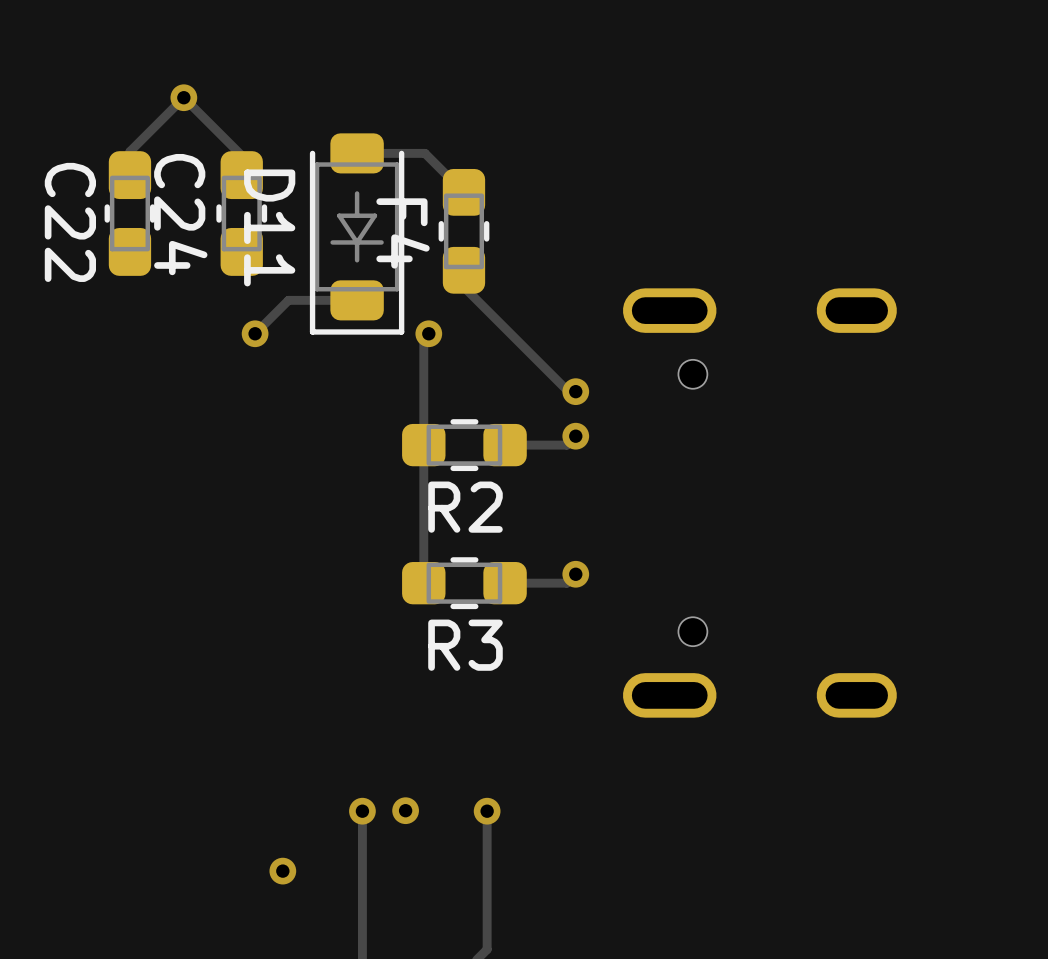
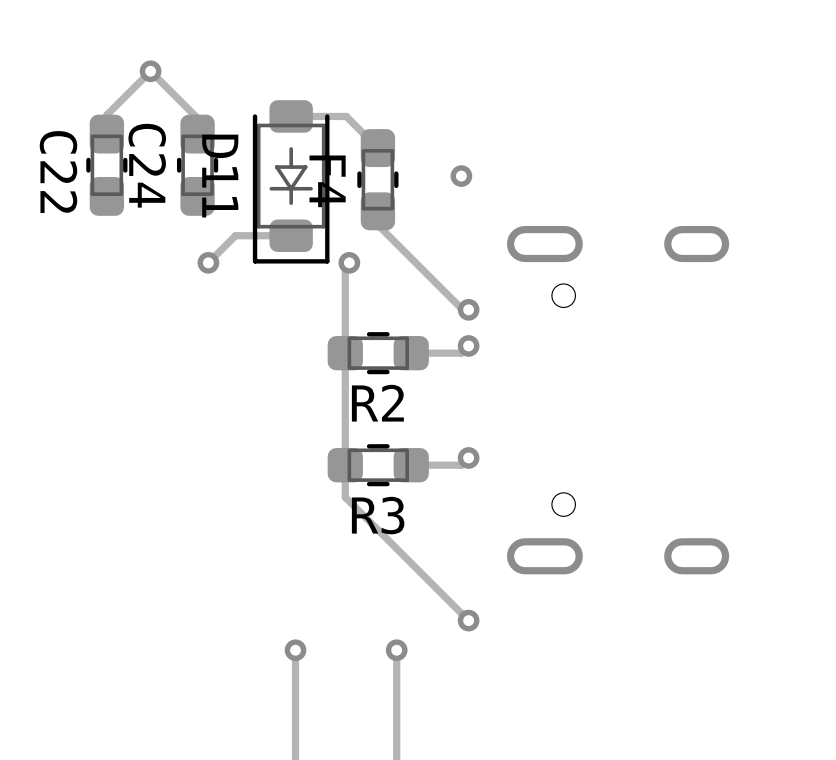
via: none -> (461, 176)
track: none -> (345, 465) (345, 497) (468, 620)
via: none -> (468, 620)
via: (405, 810) -> none
via: (282, 871) -> none

